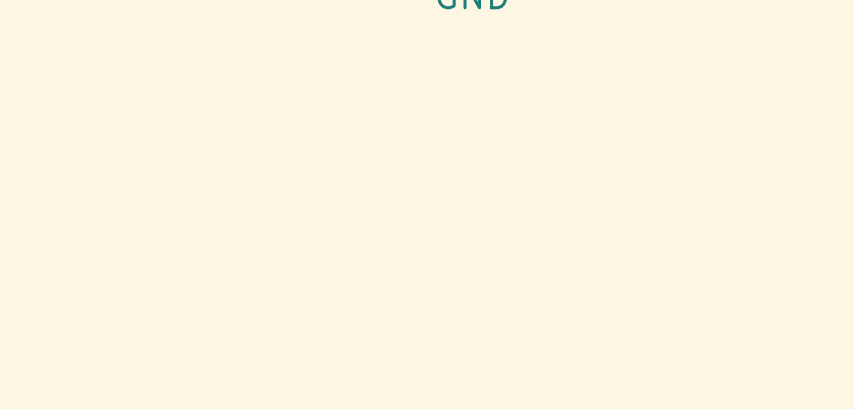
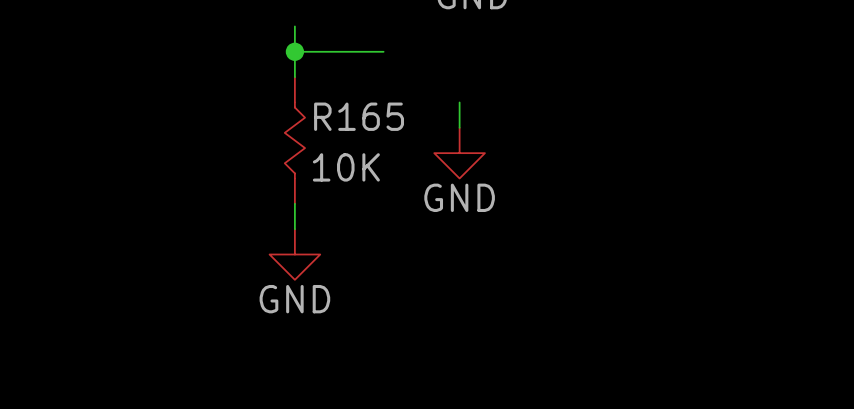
wire: none -> (294, 26) (294, 77)
wire: none -> (294, 51) (383, 51)
junction: none -> (294, 51)
wire: none -> (459, 102) (459, 127)
R165: none -> 10K (294, 140)
power symbol: none -> GND (459, 153)
wire: none -> (294, 203) (294, 229)
power symbol: none -> GND (294, 254)

